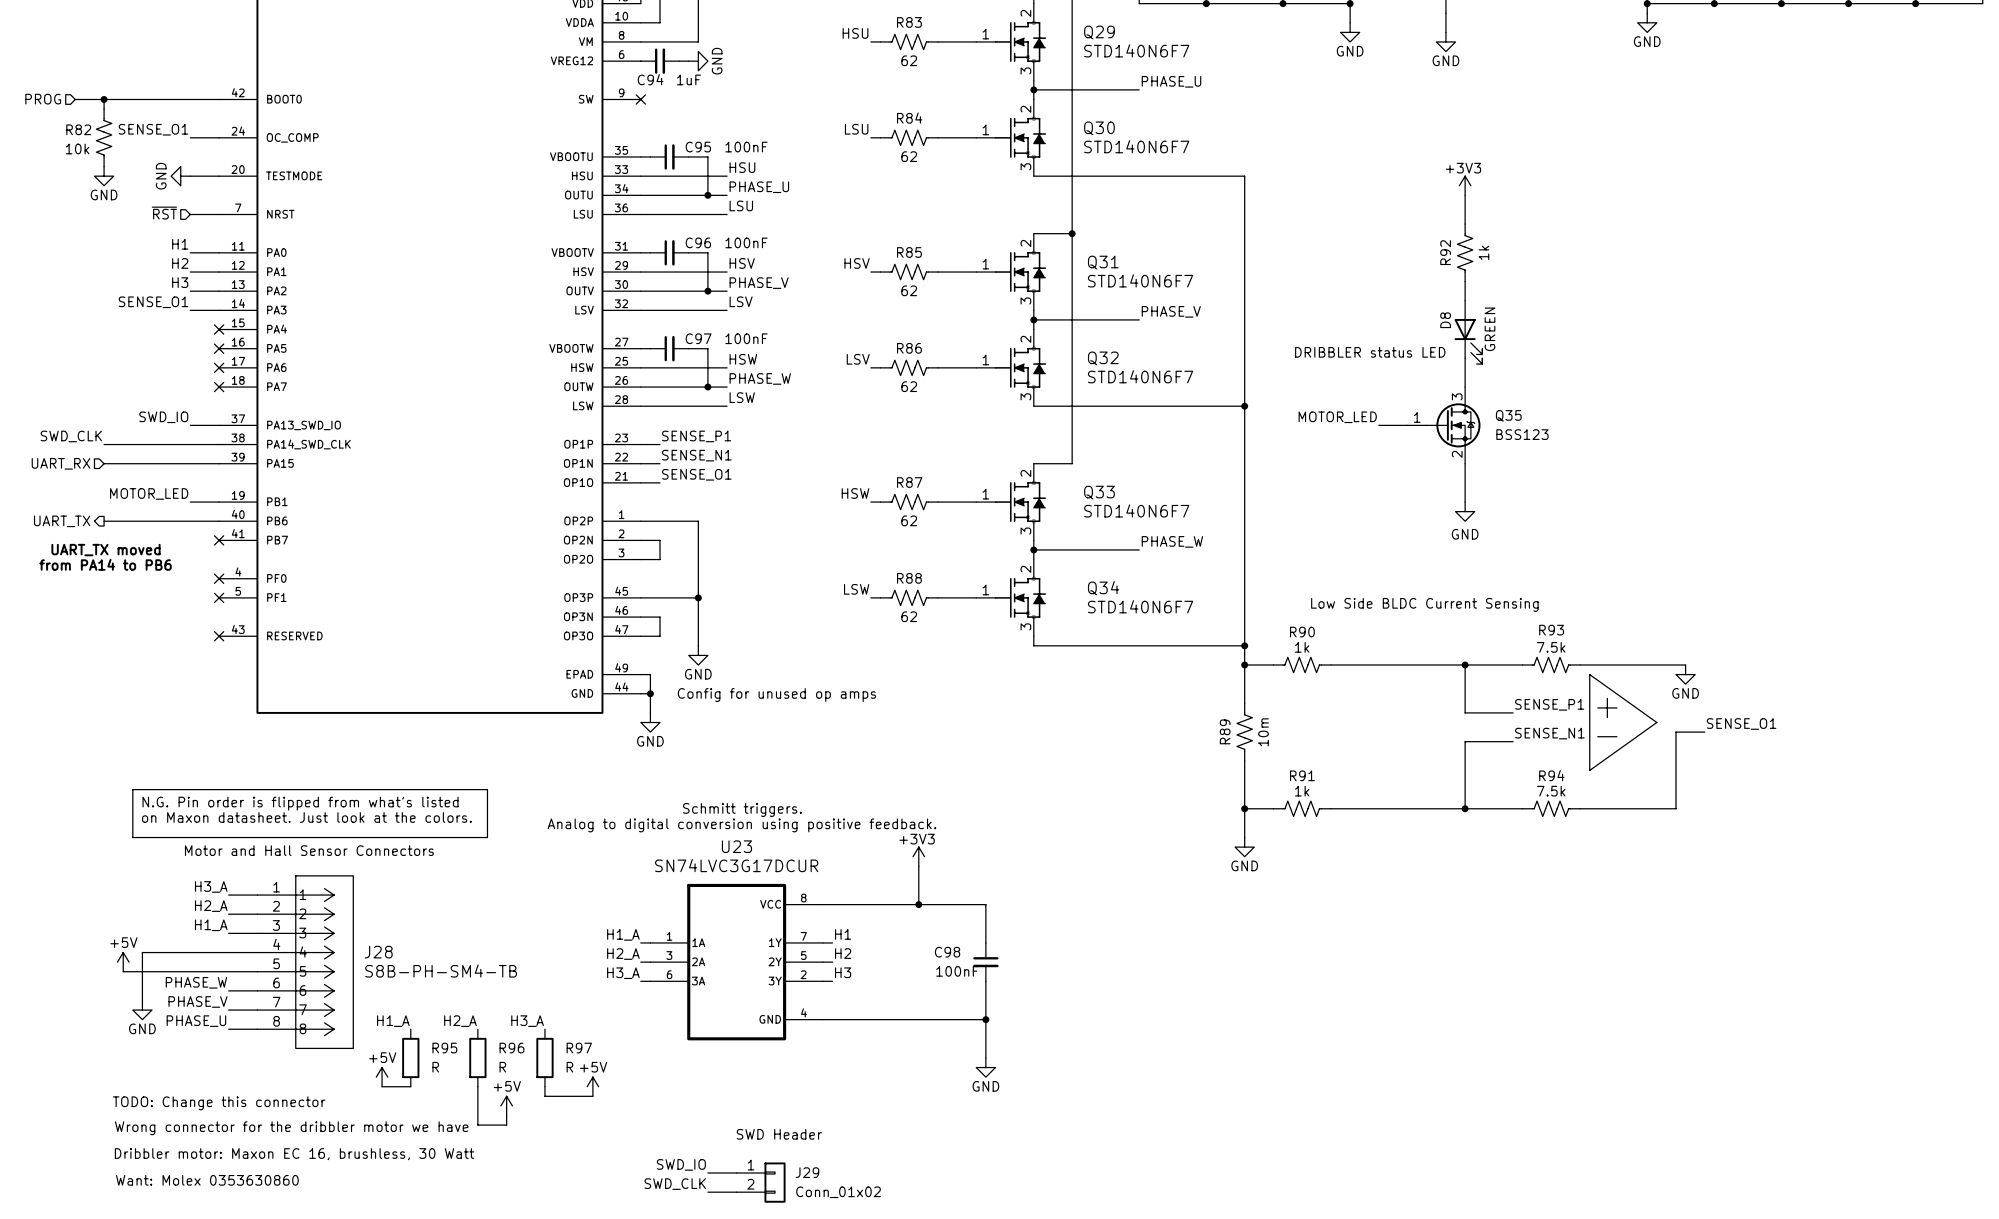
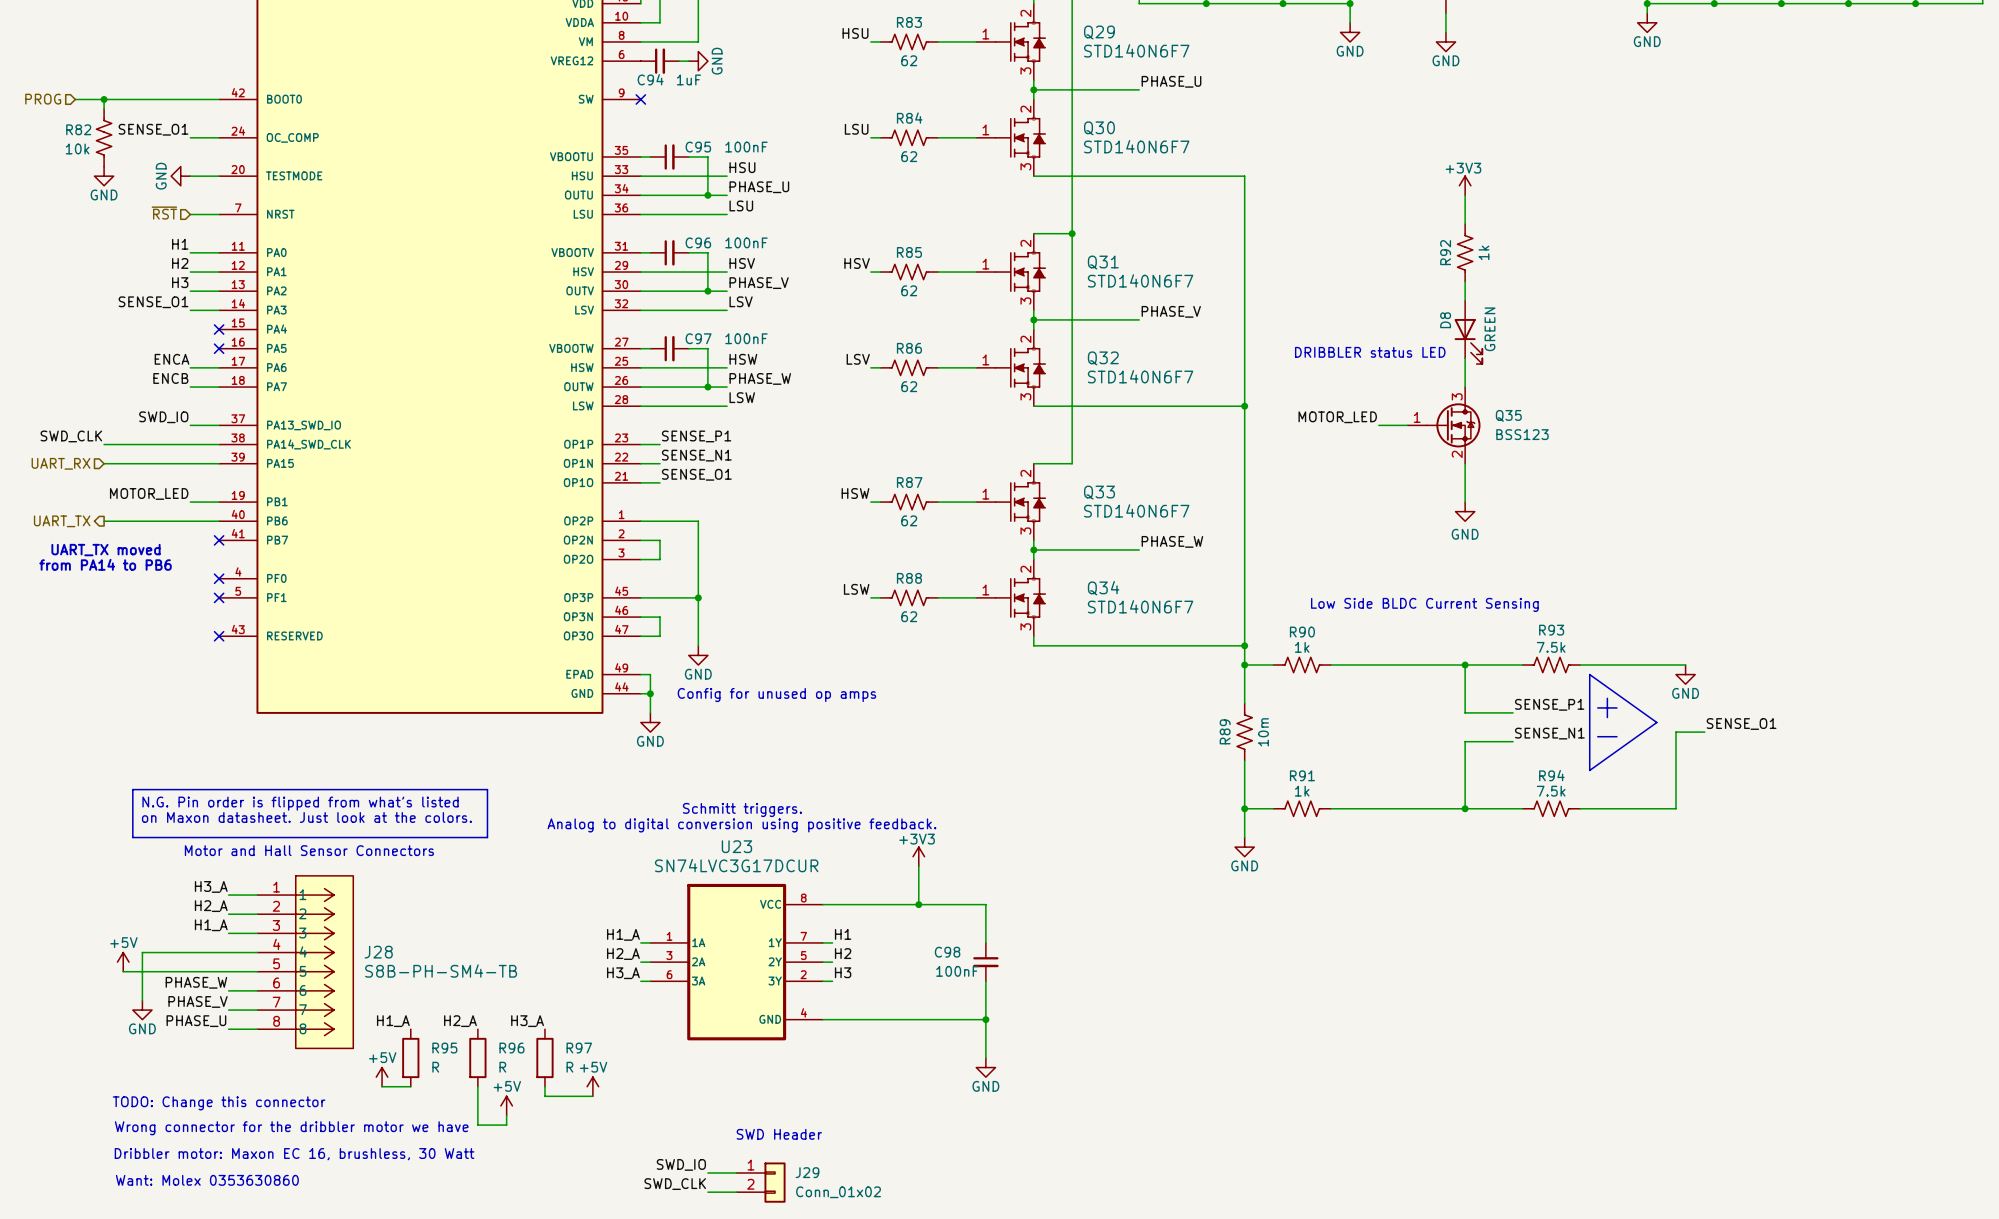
label: none -> ENCA (172, 359)
wire: none -> (190, 367) (219, 367)
no-connect mark: (219, 367) -> none
label: none -> ENCB (170, 378)
wire: none -> (190, 387) (219, 387)
no-connect mark: (219, 387) -> none

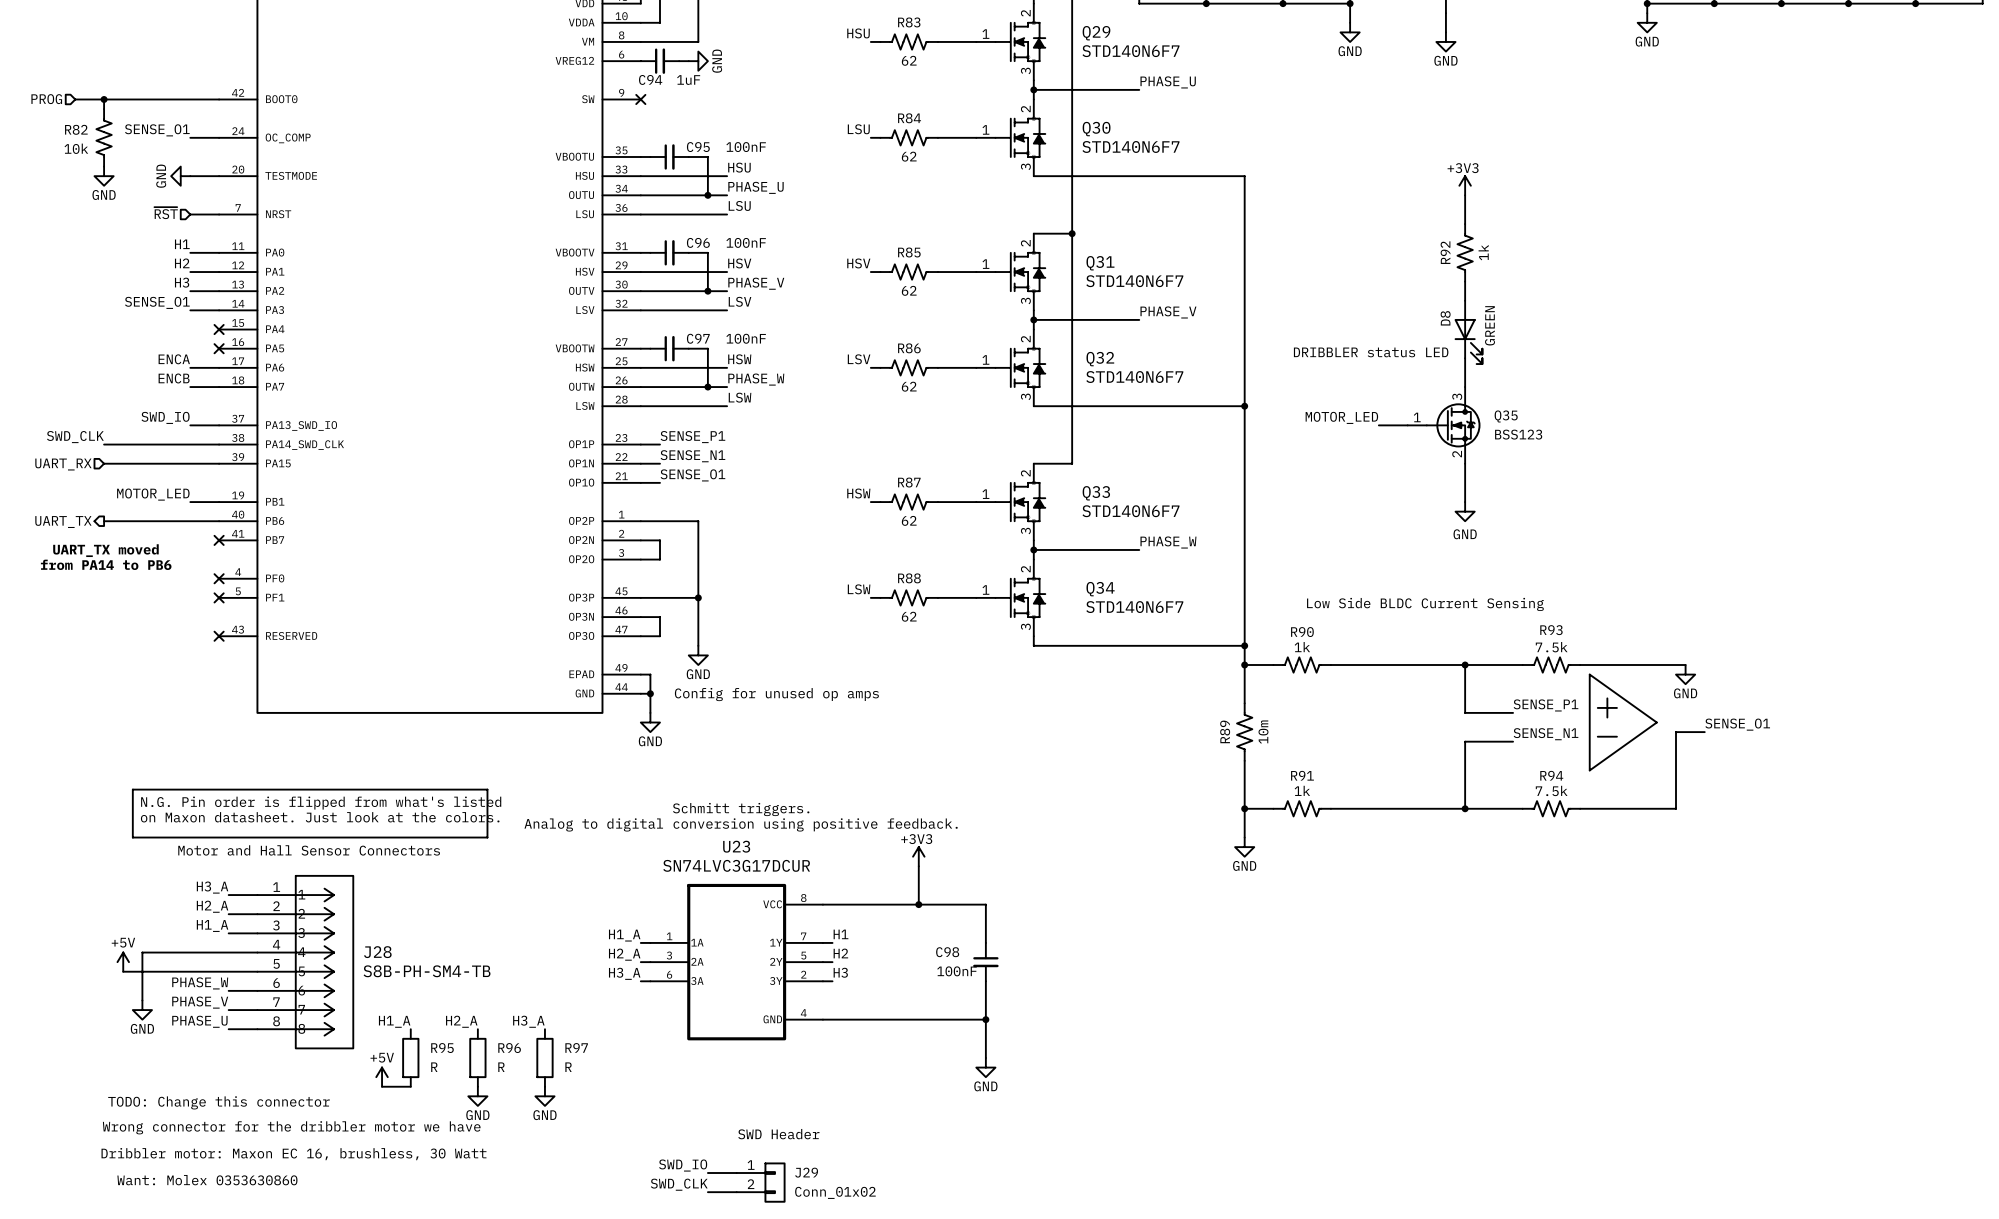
wire: (477, 1086) (477, 1125) (506, 1125) (506, 1115) -> none
wire: (544, 1086) (544, 1096) (592, 1096) -> none
power symbol: +5V (592, 1086) -> none
power symbol: none -> GND (477, 1096)
power symbol: none -> GND (544, 1096)
power symbol: +5V (506, 1105) -> none

